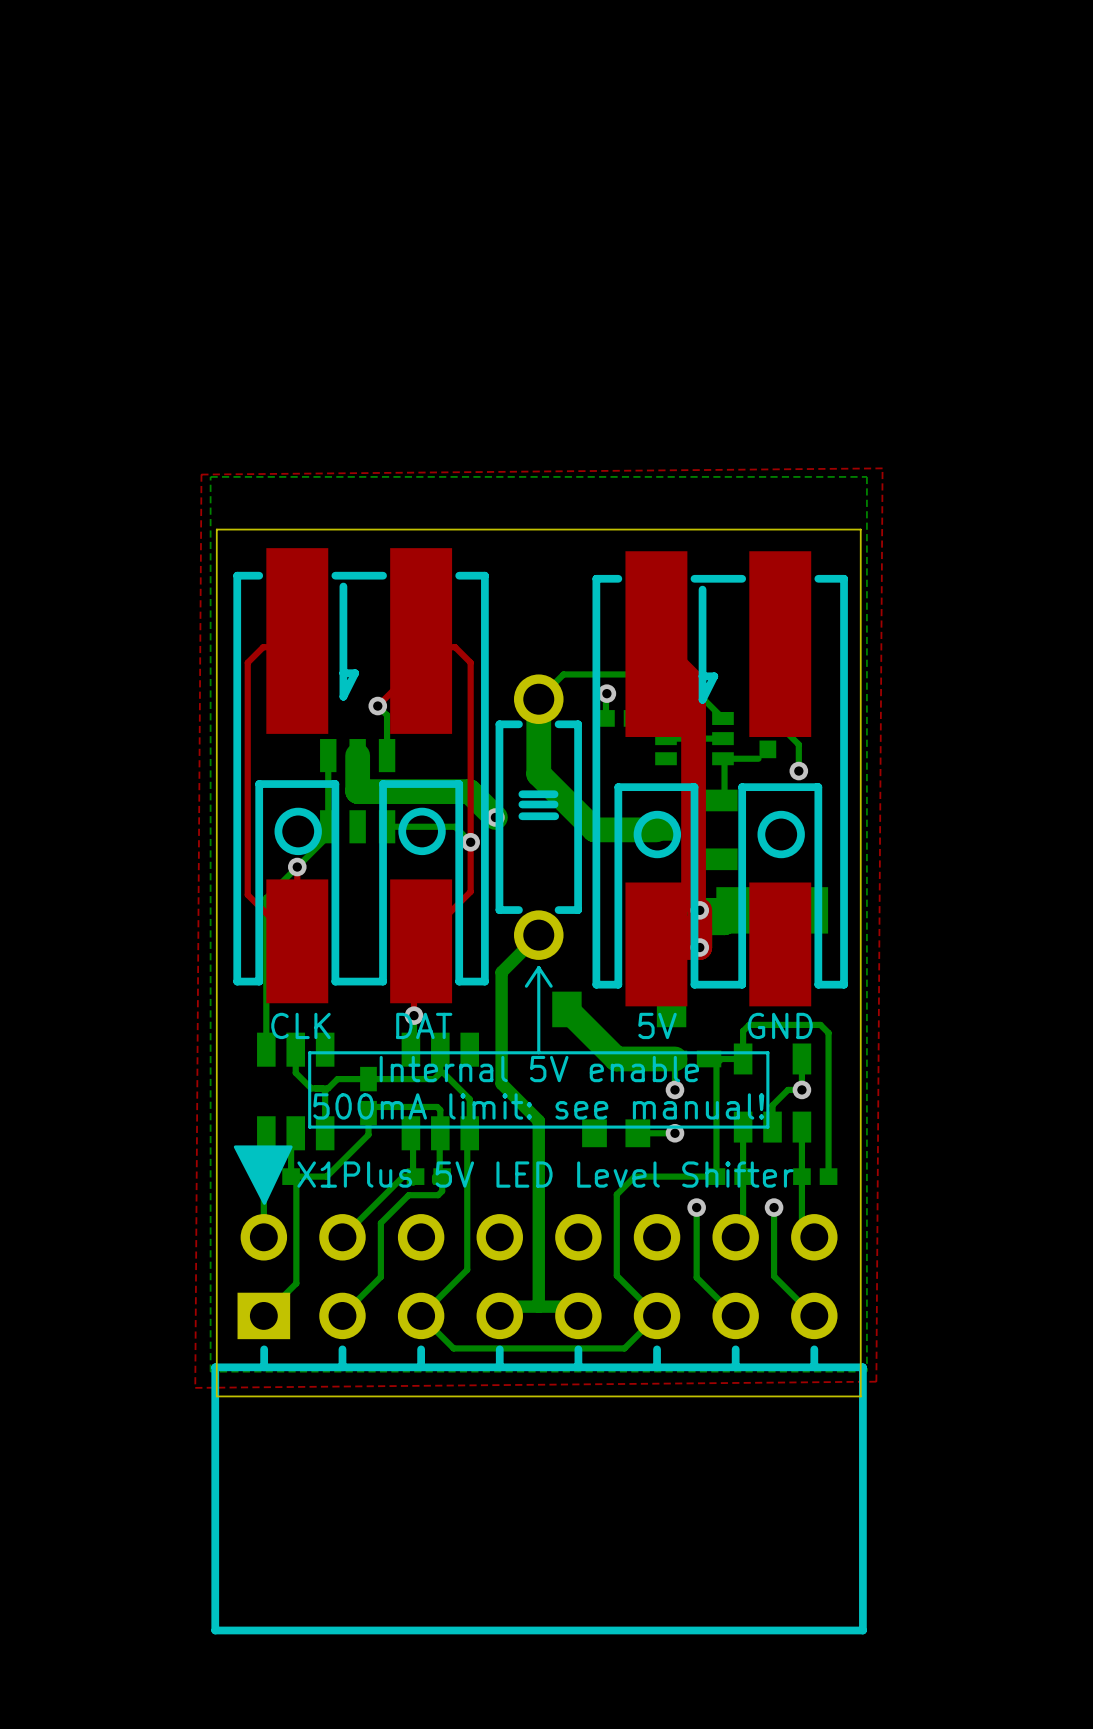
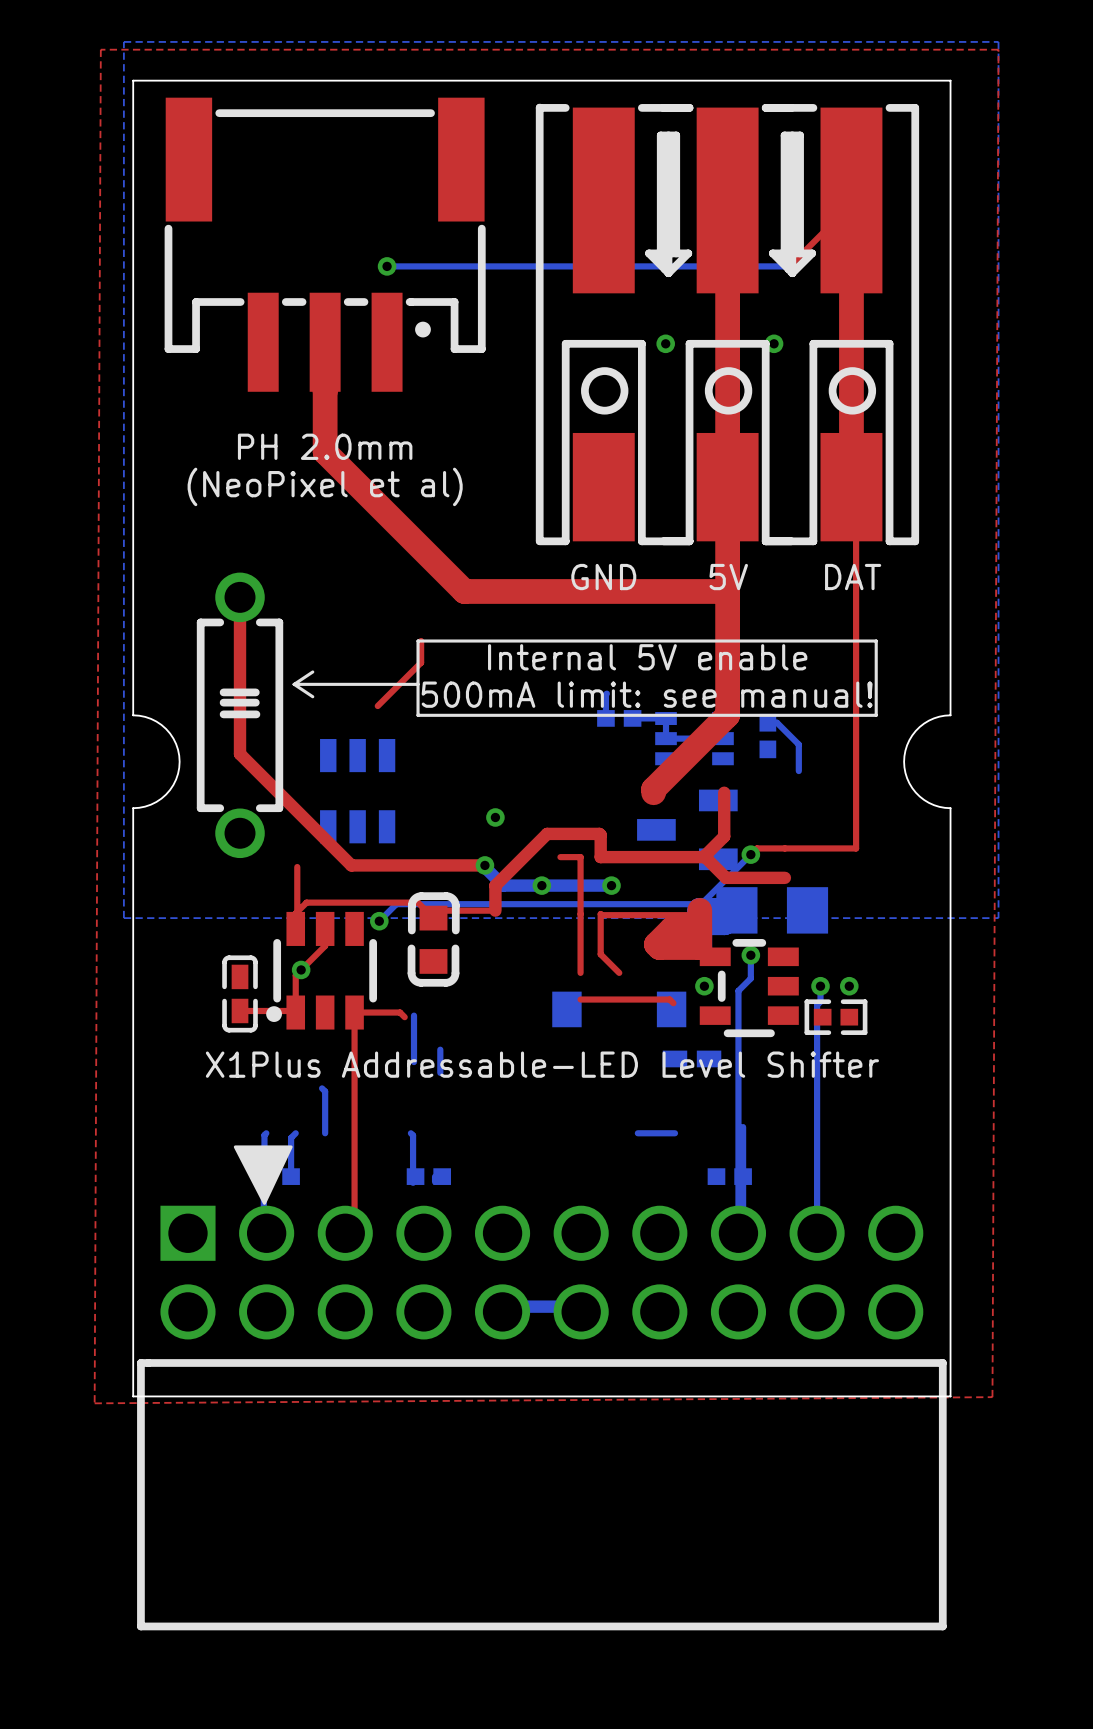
bottom zone outline: none -> (123, 41) (123, 918) (998, 918) (998, 41) (123, 41)
top track: none -> (727, 200) (727, 715) (653, 789) (653, 792)
part: none -> (325, 244)
bottom track: none -> (387, 266) (789, 266)
via: none -> (387, 266)
top track: none -> (789, 266) (851, 204) (851, 200) (851, 487) (856, 491) (856, 848) (757, 848) (750, 854)
part: none -> (727, 324)
top track: none -> (325, 342) (325, 452) (464, 591) (727, 591)
via: none -> (665, 343)
via: none -> (774, 343)
text: none -> PH 2.0mm (325, 446)
top zone outline: (882, 468) (201, 474) (195, 1387) (876, 1381) (882, 468) -> (100, 49) (94, 1403) (992, 1397) (998, 49) (100, 49)
bottom zone outline: (210, 476) (866, 476) (866, 1371) (210, 1371) (210, 476) -> none
text: none -> (NeoPixel et al) (325, 486)
top track: none -> (240, 597) (240, 754) (351, 865) (484, 865)
top track: (656, 644) (656, 646) (693, 683) (693, 901) -> none
top track: (300, 647) (263, 647) (247, 662) (247, 894) (300, 947) (302, 945) (302, 913) -> none
top track: (424, 647) (455, 647) (470, 662) (470, 891) (414, 948) (414, 1015) -> none
line: none -> (312, 671) (294, 684)
line: none -> (294, 684) (418, 684)
line: none -> (294, 684) (312, 696)
via: (606, 693) -> none
bottom track: (377, 706) (387, 715) (387, 755) -> none
via: (377, 706) -> none
bottom track: (724, 716) (722, 718) (678, 674) (563, 674) (538, 699) (538, 774) (594, 829) (656, 829) -> none
bottom track: (328, 755) (328, 836) (266, 897) (266, 1049) -> none
bottom track: (357, 755) (358, 791) (469, 791) (495, 817) -> none
bottom track: (722, 758) (758, 758) -> none
bottom track: (724, 760) (724, 800) -> none
via: (798, 771) -> none
part: (361, 775) -> none
part: (720, 778) -> none
top track: none -> (724, 792) (724, 836) (703, 857) (600, 857) (599, 833) (547, 833) (495, 885) (495, 910) (440, 910) (433, 918) (418, 902) (306, 902) (295, 913) (295, 928)
part position: (538, 817) -> (240, 715)
bottom track: (387, 832) (387, 826) (455, 826) (470, 842) -> none
via position: (470, 842) -> (484, 865)
bottom track: none -> (750, 854) (701, 904) (396, 904) (379, 921)
via: none -> (750, 854)
top track: none -> (710, 856) (704, 856) (725, 877) (784, 877)
top track: none -> (560, 857) (580, 857) (580, 972)
bottom track: none -> (484, 865) (503, 885) (611, 885)
via: (297, 867) -> none
via: none -> (541, 885)
via: none -> (611, 885)
via: (699, 910) -> none
top track: none -> (704, 915) (600, 914) (600, 954) (619, 972)
via: none -> (379, 921)
top track: none -> (325, 928) (325, 945) (295, 975) (295, 1012) (294, 1010) (240, 1010)
bottom track: (538, 935) (501, 972) (501, 1083) (538, 1120) (538, 1306) -> none
via: (699, 947) -> none
bottom track: none -> (750, 955) (750, 978) (738, 990) (738, 1233)
via: none -> (750, 955)
line: (538, 967) (538, 1052) -> none
line: (538, 967) (551, 986) -> none
line: (538, 967) (526, 986) -> none
via: none -> (301, 969)
via: none -> (704, 986)
bottom track: none -> (820, 986) (820, 1001) (817, 1005) (817, 1233)
via: none -> (820, 986)
via: none -> (849, 986)
top track: none -> (580, 999) (669, 999) (673, 1003)
bottom track: (566, 1009) (616, 1058) (674, 1058) (674, 1089) -> none
via: (414, 1015) -> none
top track: none -> (404, 1017) (400, 1012) (354, 1012) (354, 1223) (345, 1233)
text: CLK (300, 1025) -> none
text position: DAT (424, 1025) -> DAT (853, 577)
text position: 5V (657, 1025) -> 5V (728, 577)
text position: GND (780, 1025) -> GND (603, 577)
bottom track: (295, 1049) (295, 1072) (311, 1088) (328, 1088) (337, 1079) (434, 1079) (440, 1072) (443, 1072) (469, 1099) (469, 1133) (467, 1135) (467, 1269) (421, 1315) (453, 1348) (624, 1348) (657, 1315) (616, 1275) (616, 1194) (634, 1176) (716, 1176) (716, 1063) (721, 1058) (743, 1058) (743, 1031) (749, 1024) (820, 1024) (828, 1032) (828, 1176) -> none
line: (309, 1052) (767, 1052) (767, 1127) (309, 1127) (309, 1052) -> (418, 641) (876, 641) (876, 715) (418, 715) (418, 641)
bottom track: (801, 1058) (801, 1089) (787, 1089) (772, 1105) (772, 1127) -> none
text: none -> X1Plus Addressable-LED Level Shifter (542, 1064)
text position: Internal 5V enable (539, 1069) -> Internal 5V enable (647, 657)
via: (674, 1089) -> none
via: (801, 1089) -> none
part: (295, 1091) -> none
part side: bottom (440, 1091) -> top (321, 970)
part side: bottom (772, 1093) -> top (749, 988)
part side: bottom (368, 1096) -> top (240, 993)
text position: 500mA limit: see manual! (538, 1106) -> 500mA limit: see manual! (647, 694)
bottom track: (363, 1113) (370, 1106) (437, 1106) (440, 1110) (439, 1176) -> none
bottom track: (368, 1113) (368, 1134) (326, 1176) (291, 1176) (296, 1181) (296, 1283) (263, 1315) -> none
bottom track: (801, 1127) (801, 1226) -> none
part side: bottom (616, 1133) -> top (433, 939)
via: (674, 1133) -> none
text: X1Plus 5V LED Level Shifter (545, 1174) -> none
bottom track: (415, 1176) (403, 1176) (342, 1237) -> none
bottom track: (442, 1176) (442, 1191) (438, 1195) (408, 1195) (380, 1223) (380, 1276) (341, 1315) -> none
part side: bottom (815, 1176) -> top (835, 1017)
bottom track: (696, 1207) (696, 1277) (735, 1315) -> none
via: (696, 1207) -> none
bottom track: (774, 1207) (774, 1276) (813, 1315) -> none
via: (774, 1207) -> none
part footprint: [211, 1214, 867, 1635] -> [137, 1205, 947, 1631]
board edge: (216, 1396) (216, 529) (860, 529) (860, 1396) -> (216, 1396) (133, 1396) (133, 808) (150, 804) (166, 794) (176, 779) (179, 761) (176, 743) (166, 728) (150, 718) (133, 715) (133, 80) (950, 80) (950, 715) (928, 720) (915, 730) (907, 745) (904, 761) (907, 778) (915, 792) (928, 802) (950, 808) (950, 1396) (860, 1396)

